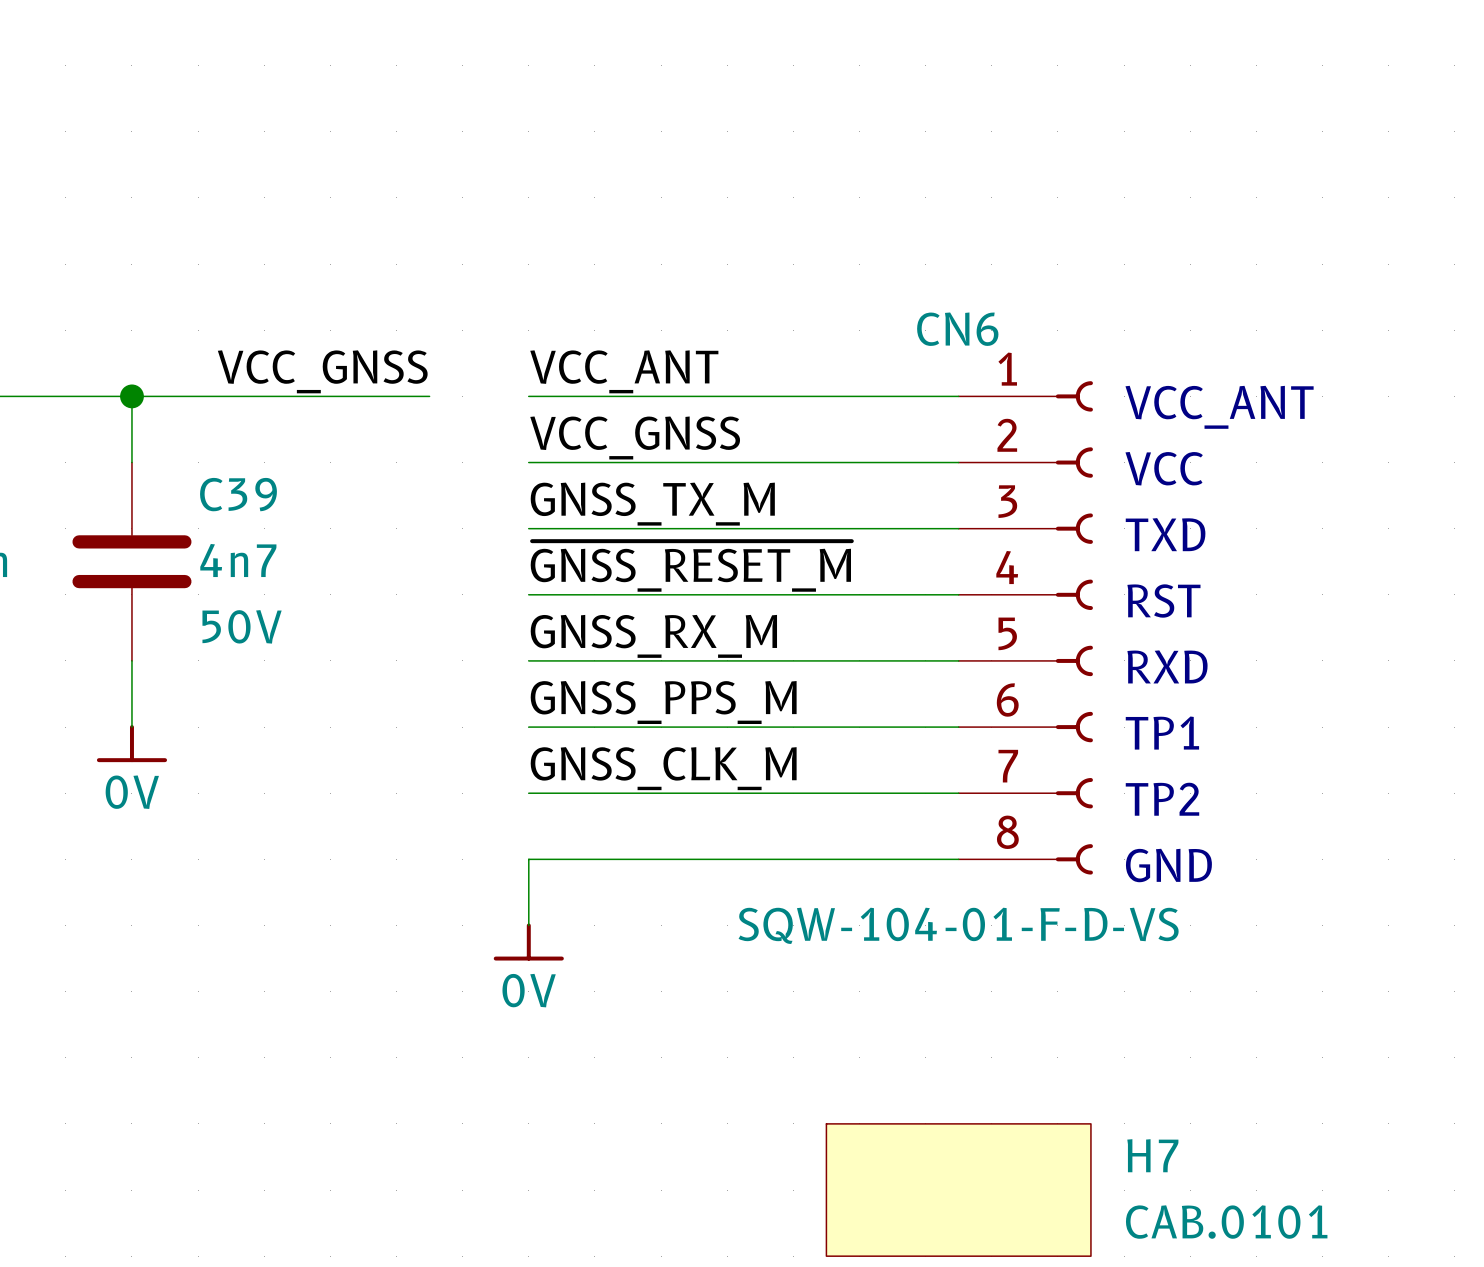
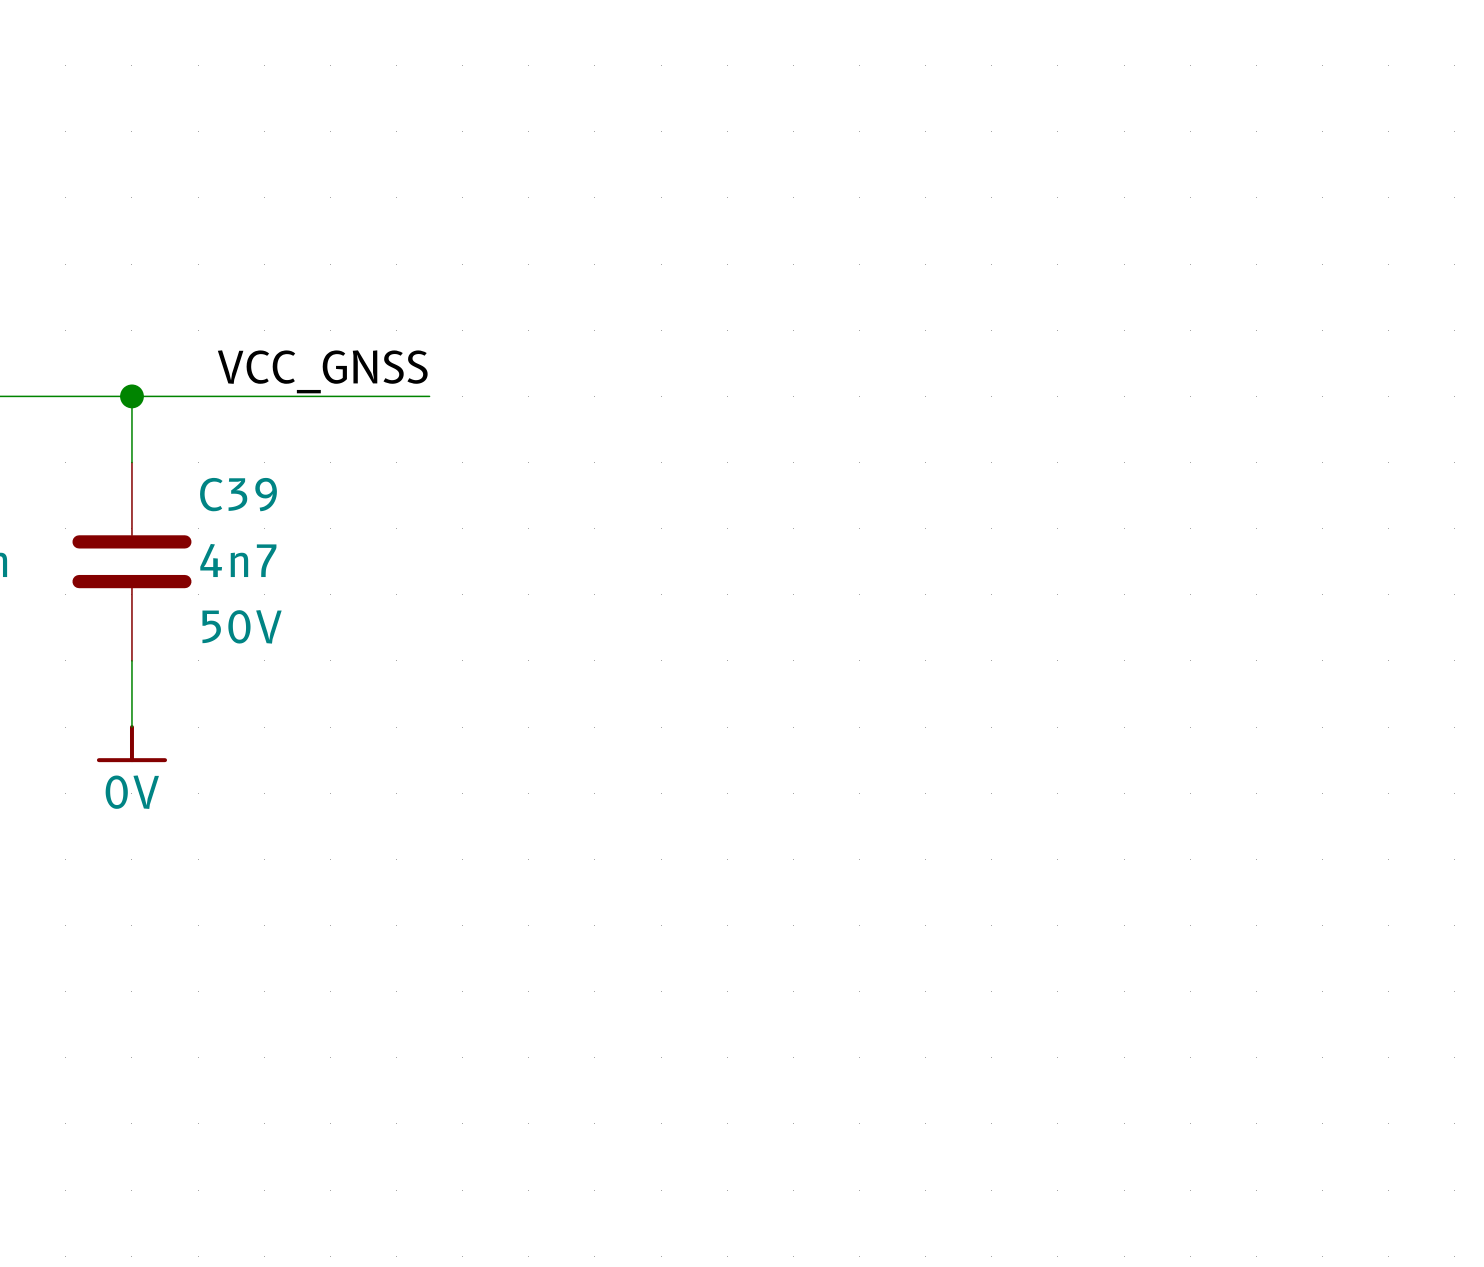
label: VCC_ANT (624, 371) -> none
wire: (528, 396) (958, 396) -> none
text: VCC_ANT (1219, 407) -> none
label: VCC_GNSS (635, 437) -> none
wire: (528, 462) (958, 462) -> none
text: VCC (1164, 468) -> none
label: GNSS_TX_M (652, 504) -> none
wire: (528, 528) (958, 528) -> none
text: TXD (1165, 534) -> none
label: ~{GNSS_RESET_M} (691, 566) -> none
wire: (528, 594) (958, 594) -> none
text: RST (1163, 601) -> none
CN6: SQW-104-01-F-D-VS (1025, 627) -> none
label: GNSS_RX_M (653, 636) -> none
wire: (528, 660) (958, 660) -> none
text: RXD (1167, 666) -> none
label: GNSS_PPS_M (663, 702) -> none
wire: (528, 727) (958, 727) -> none
text: TP1 (1162, 733) -> none
label: GNSS_CLK_M (663, 768) -> none
wire: (528, 793) (958, 793) -> none
text: TP2 (1162, 799) -> none
wire: (958, 859) (528, 859) (528, 925) -> none
text: GND (1168, 865) -> none
power symbol: 0V (528, 942) -> none
H7: CAB.0101 (958, 1190) -> none

